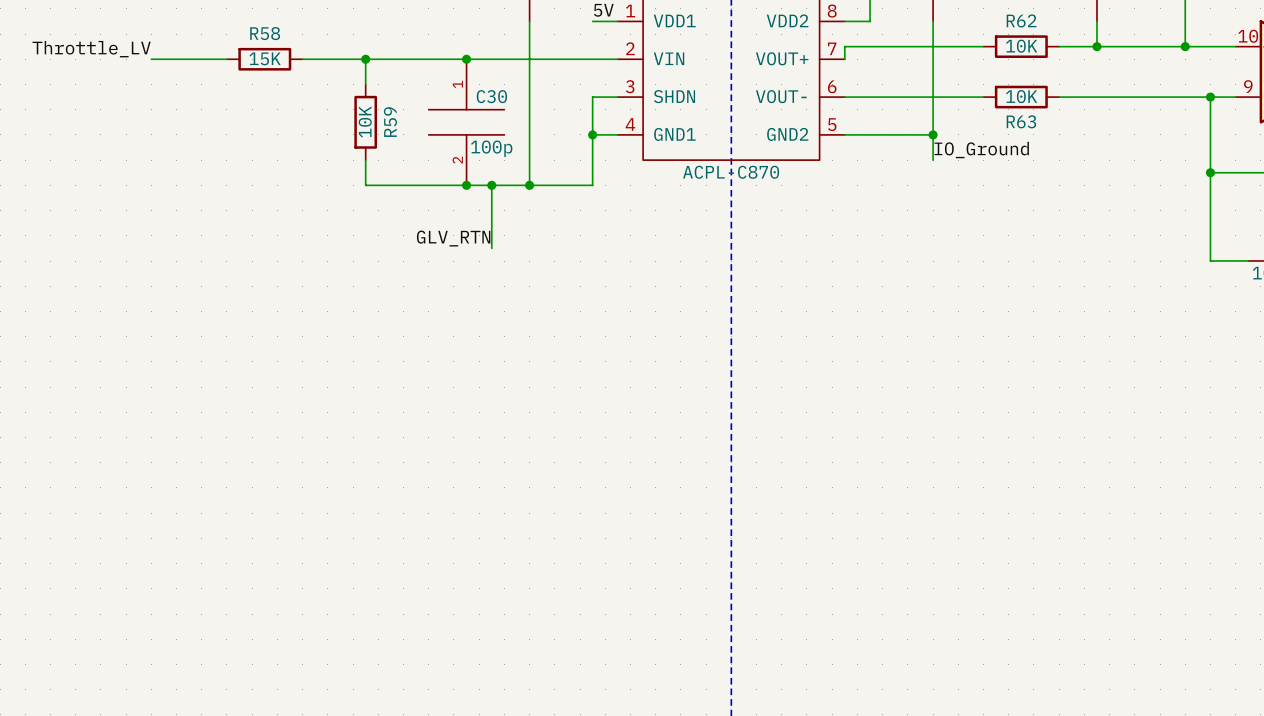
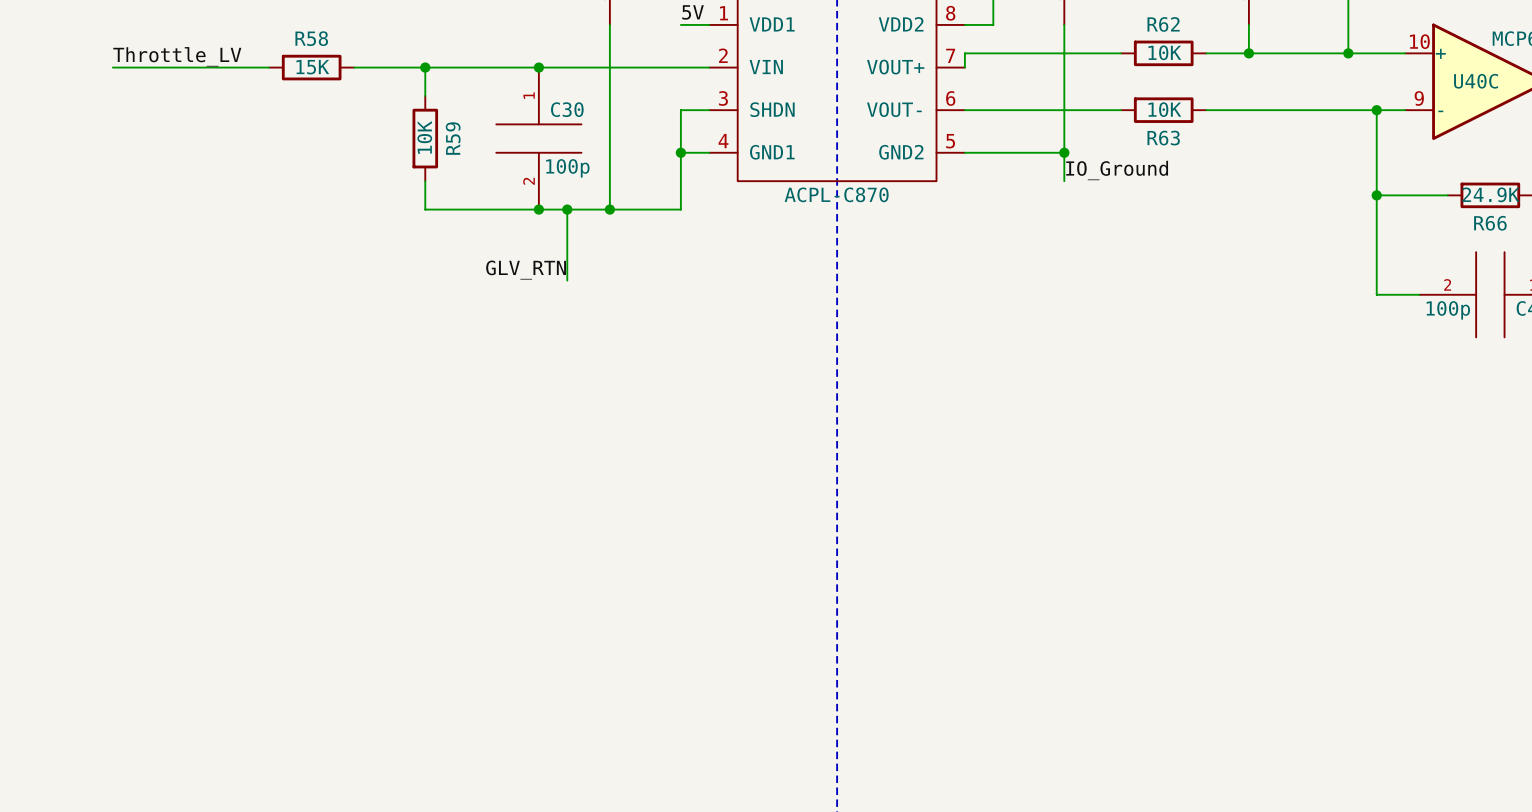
label position: Throttle_LV (91, 49) -> Throttle_LV (177, 56)
wire: none -> (112, 67) (183, 67)

